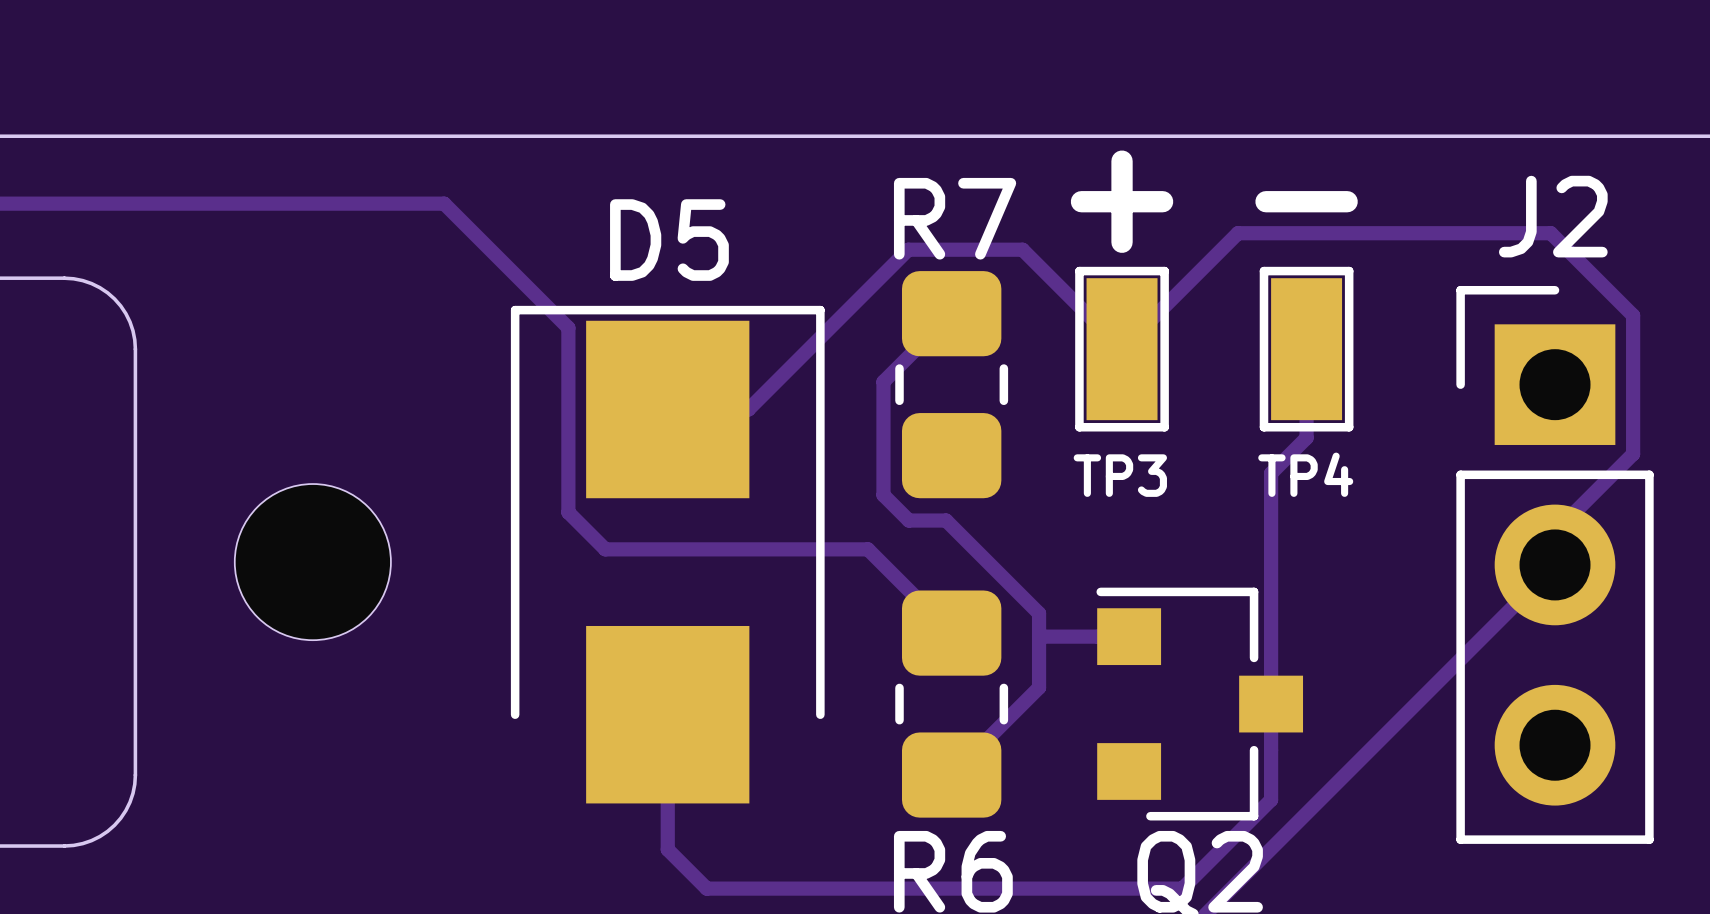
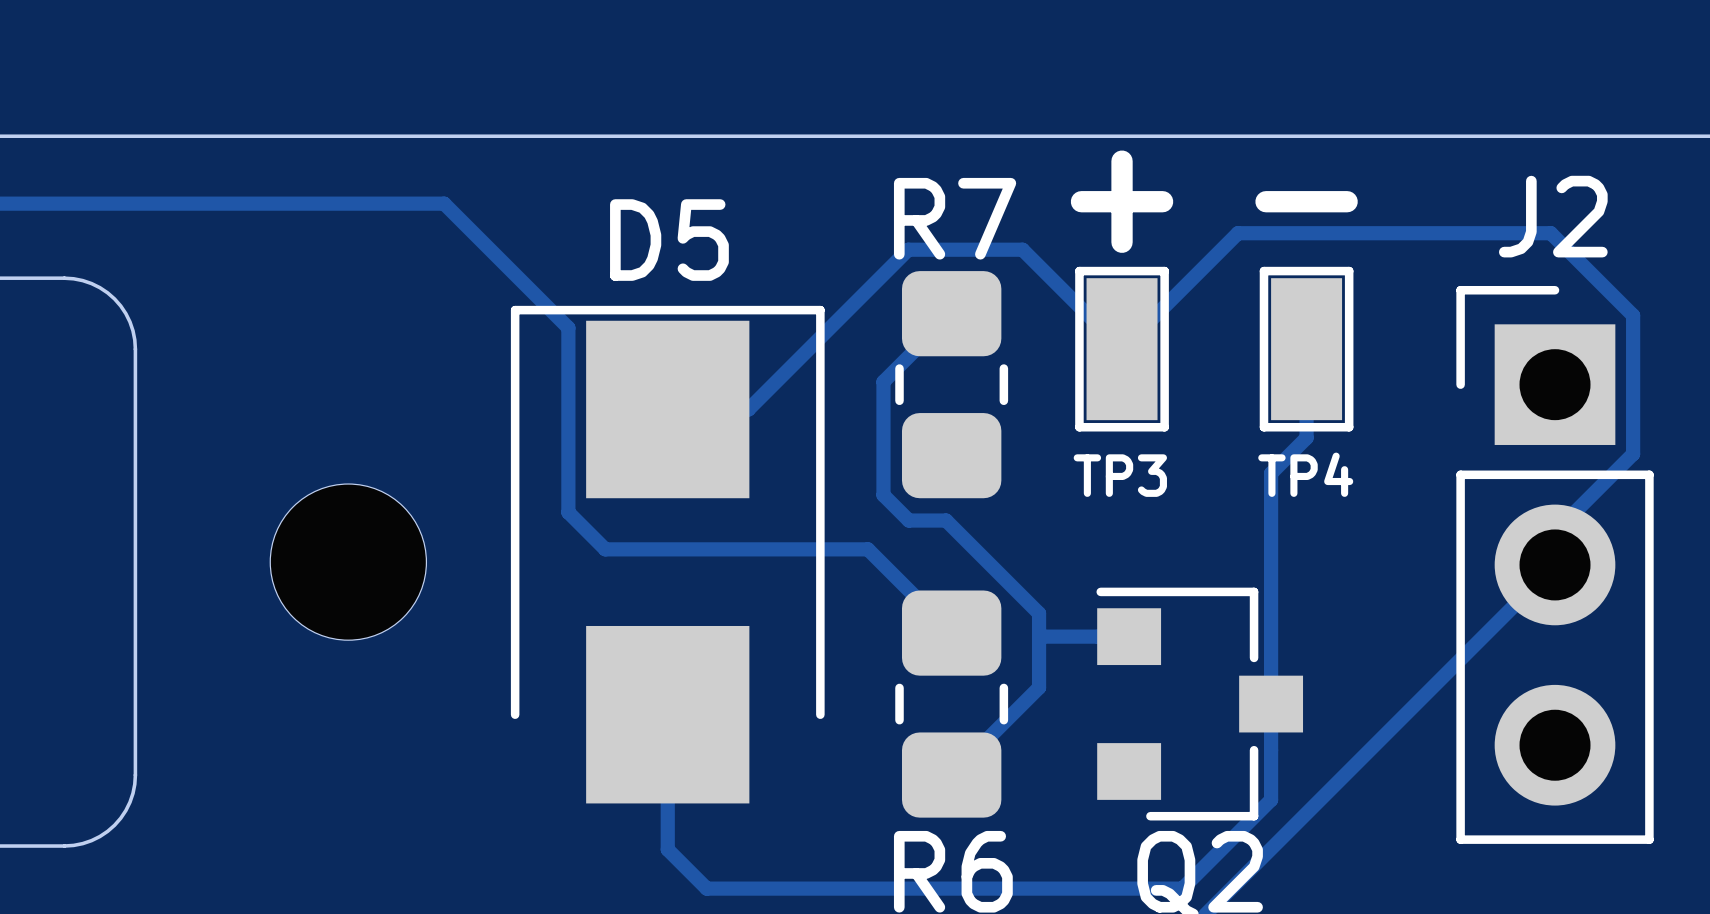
part position: (312, 562) -> (348, 562)

